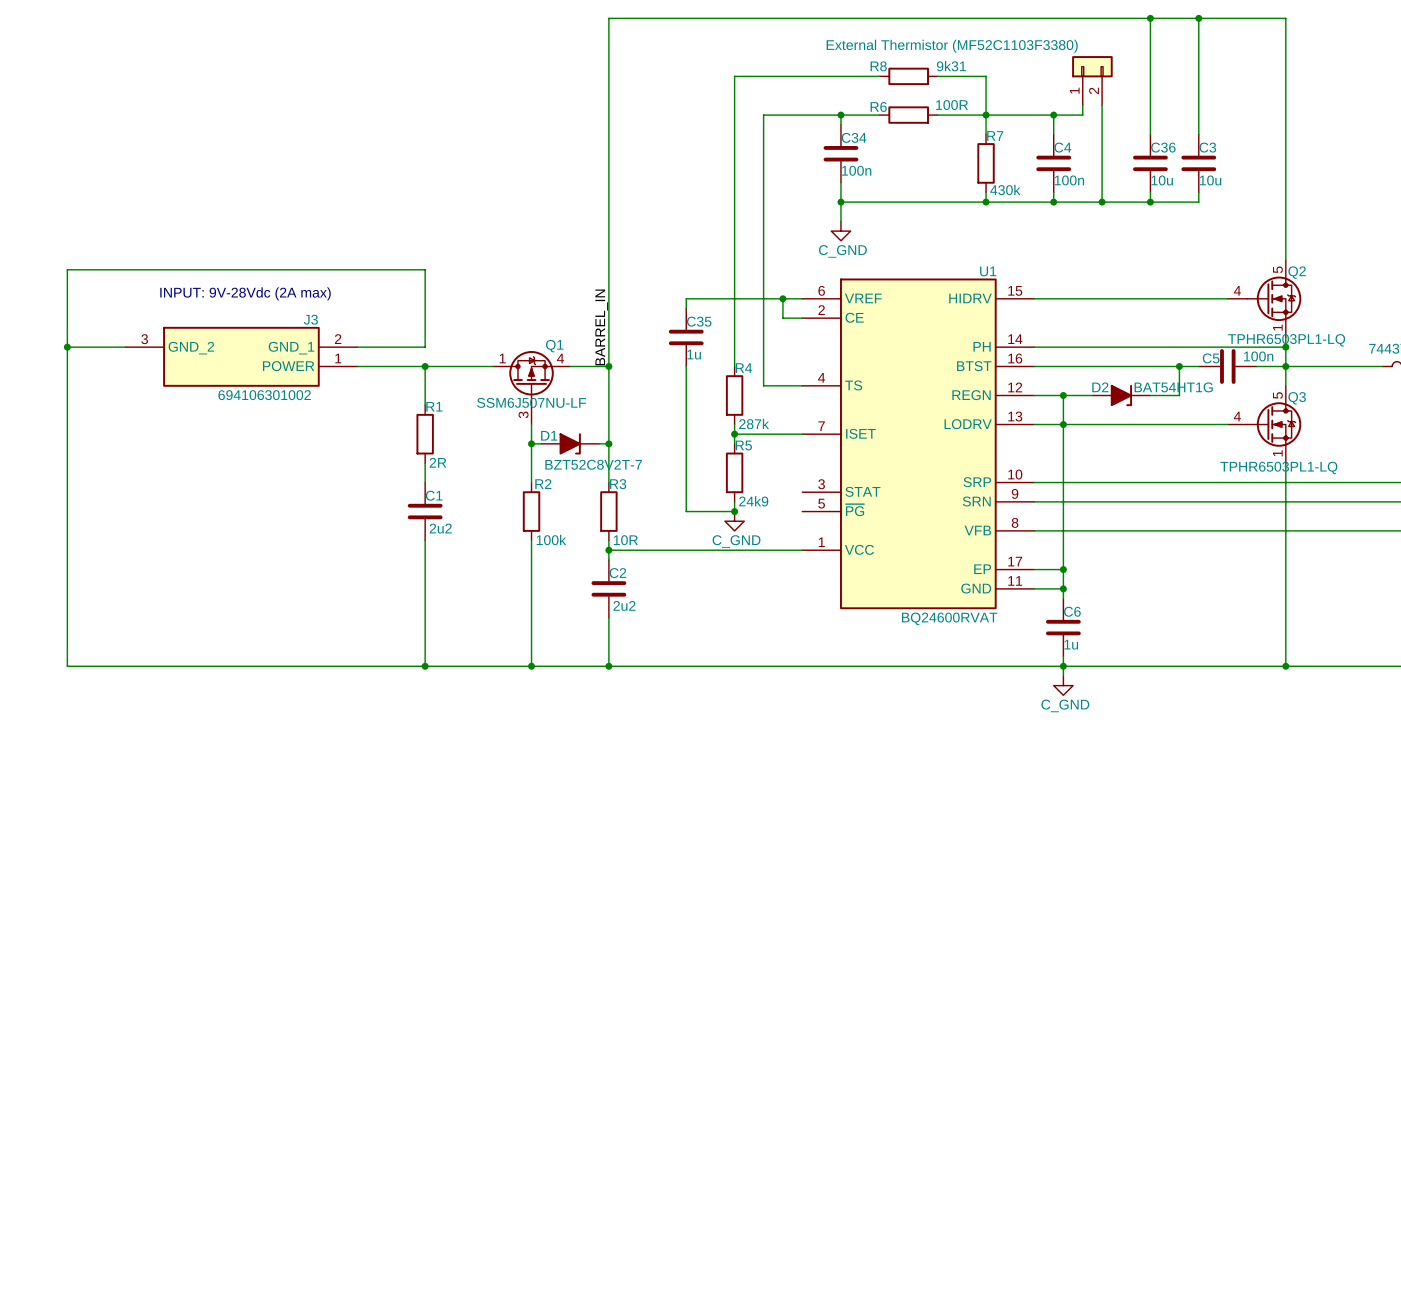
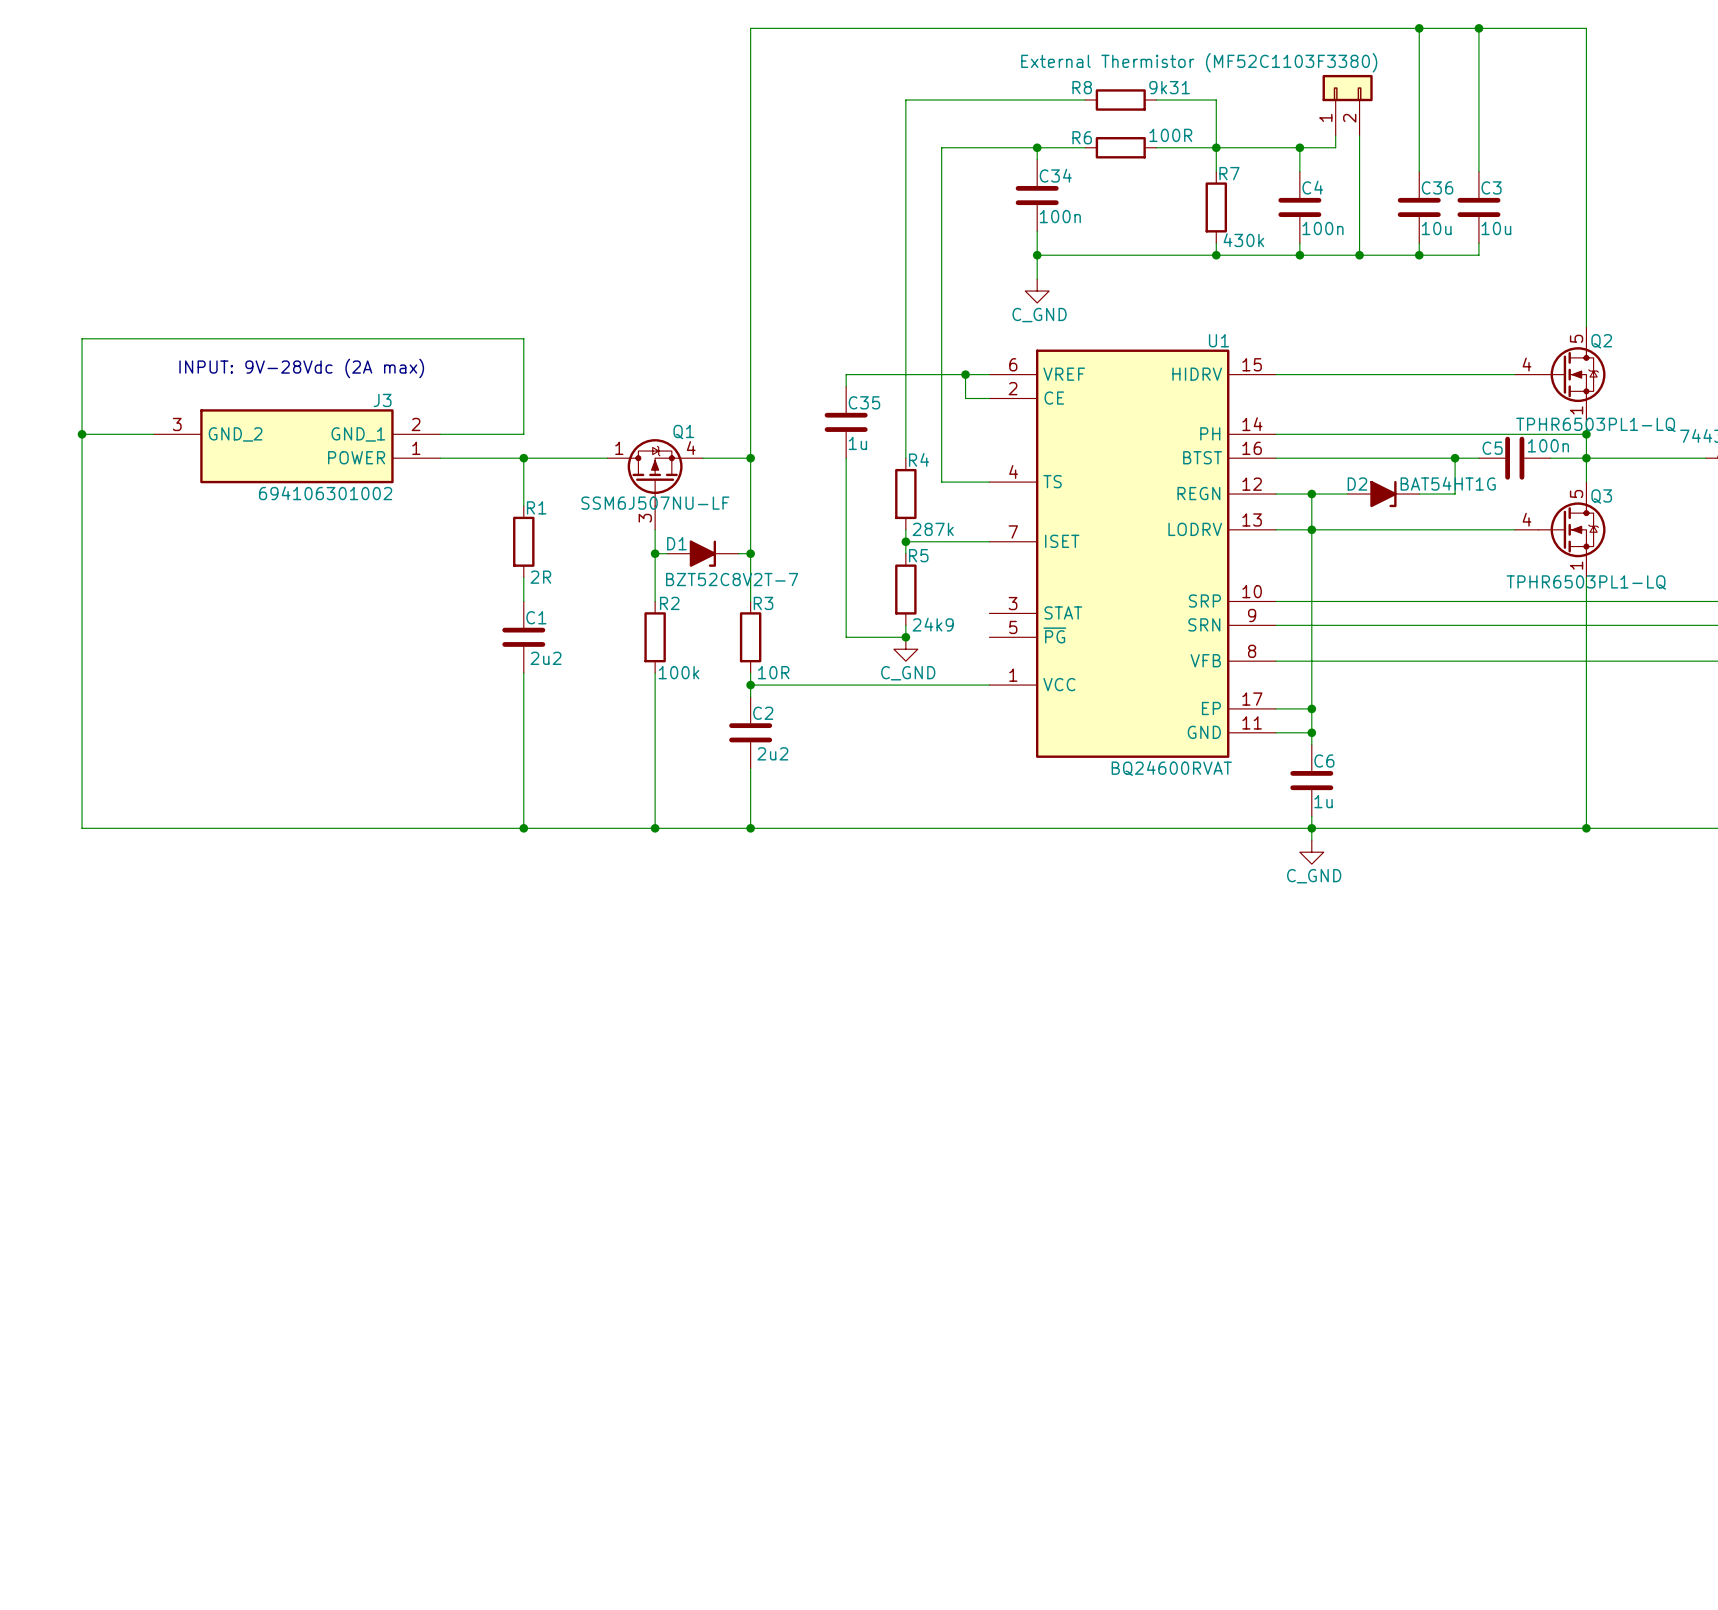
label: BARREL_IN (601, 327) -> none

